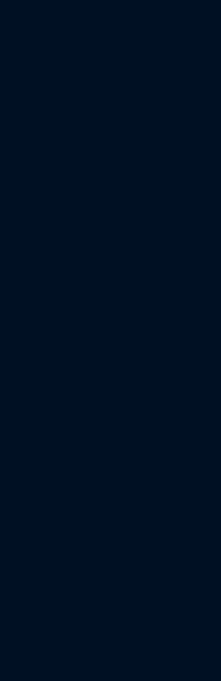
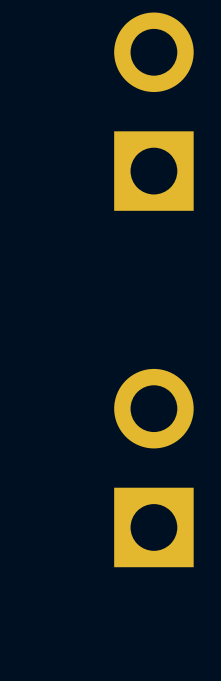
part: none -> (153, 111)
part: none -> (153, 468)

